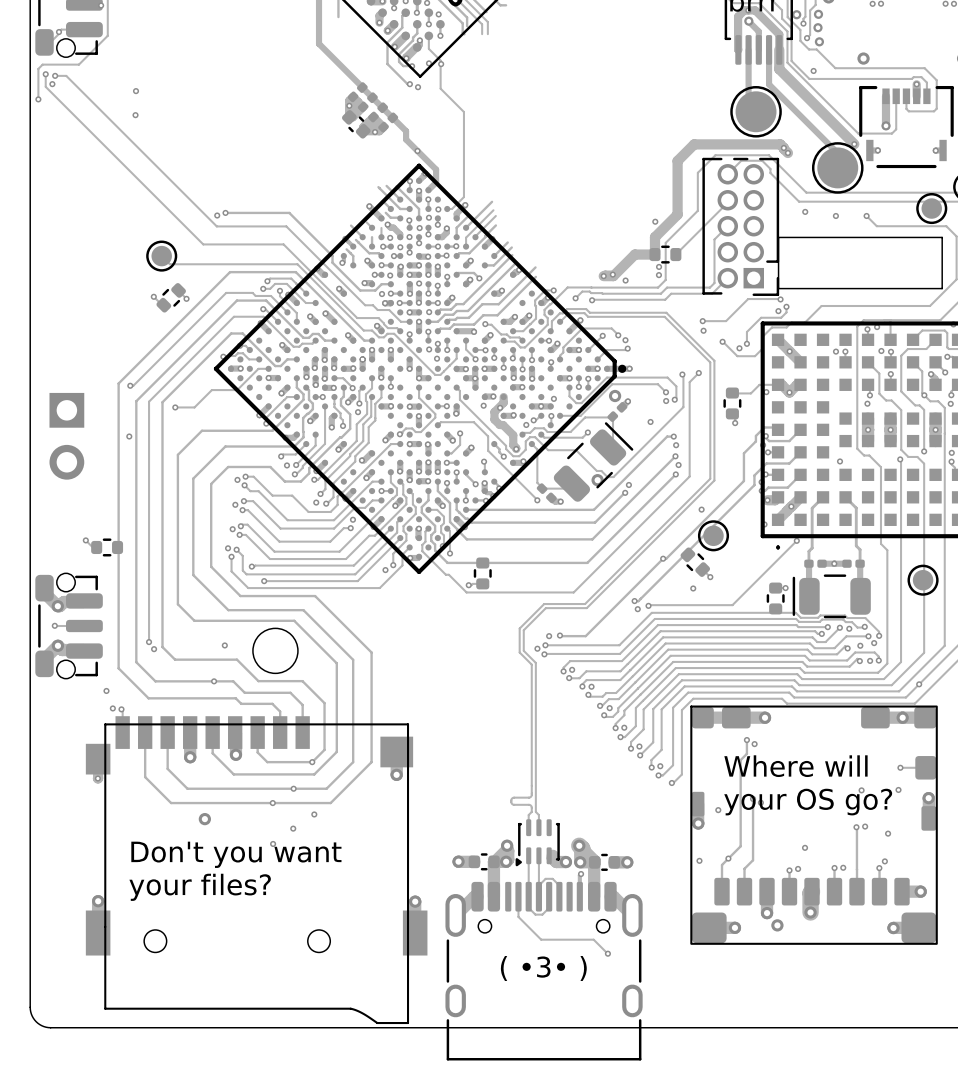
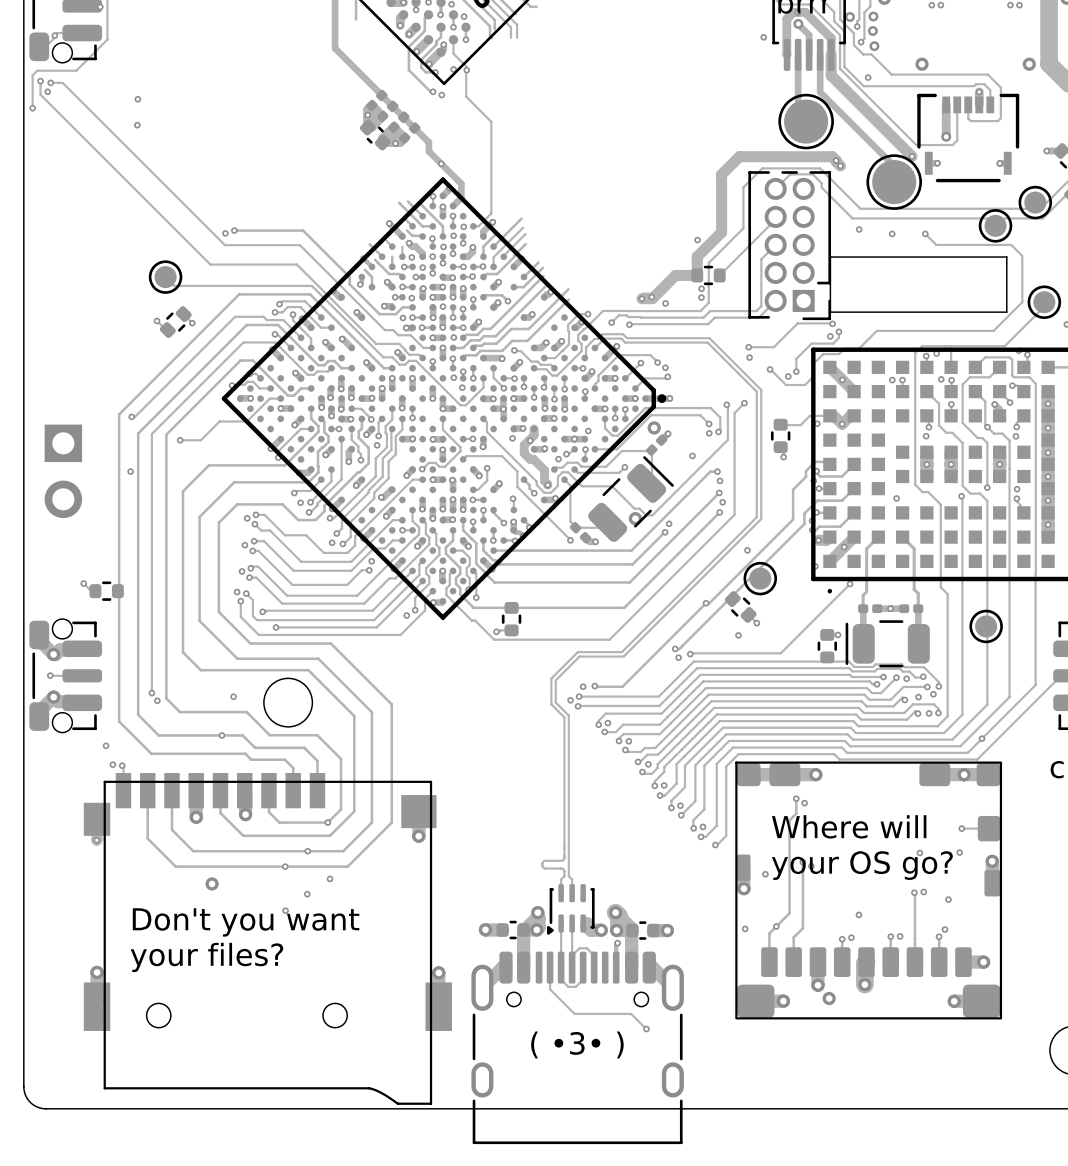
via: none -> (763, 37)

